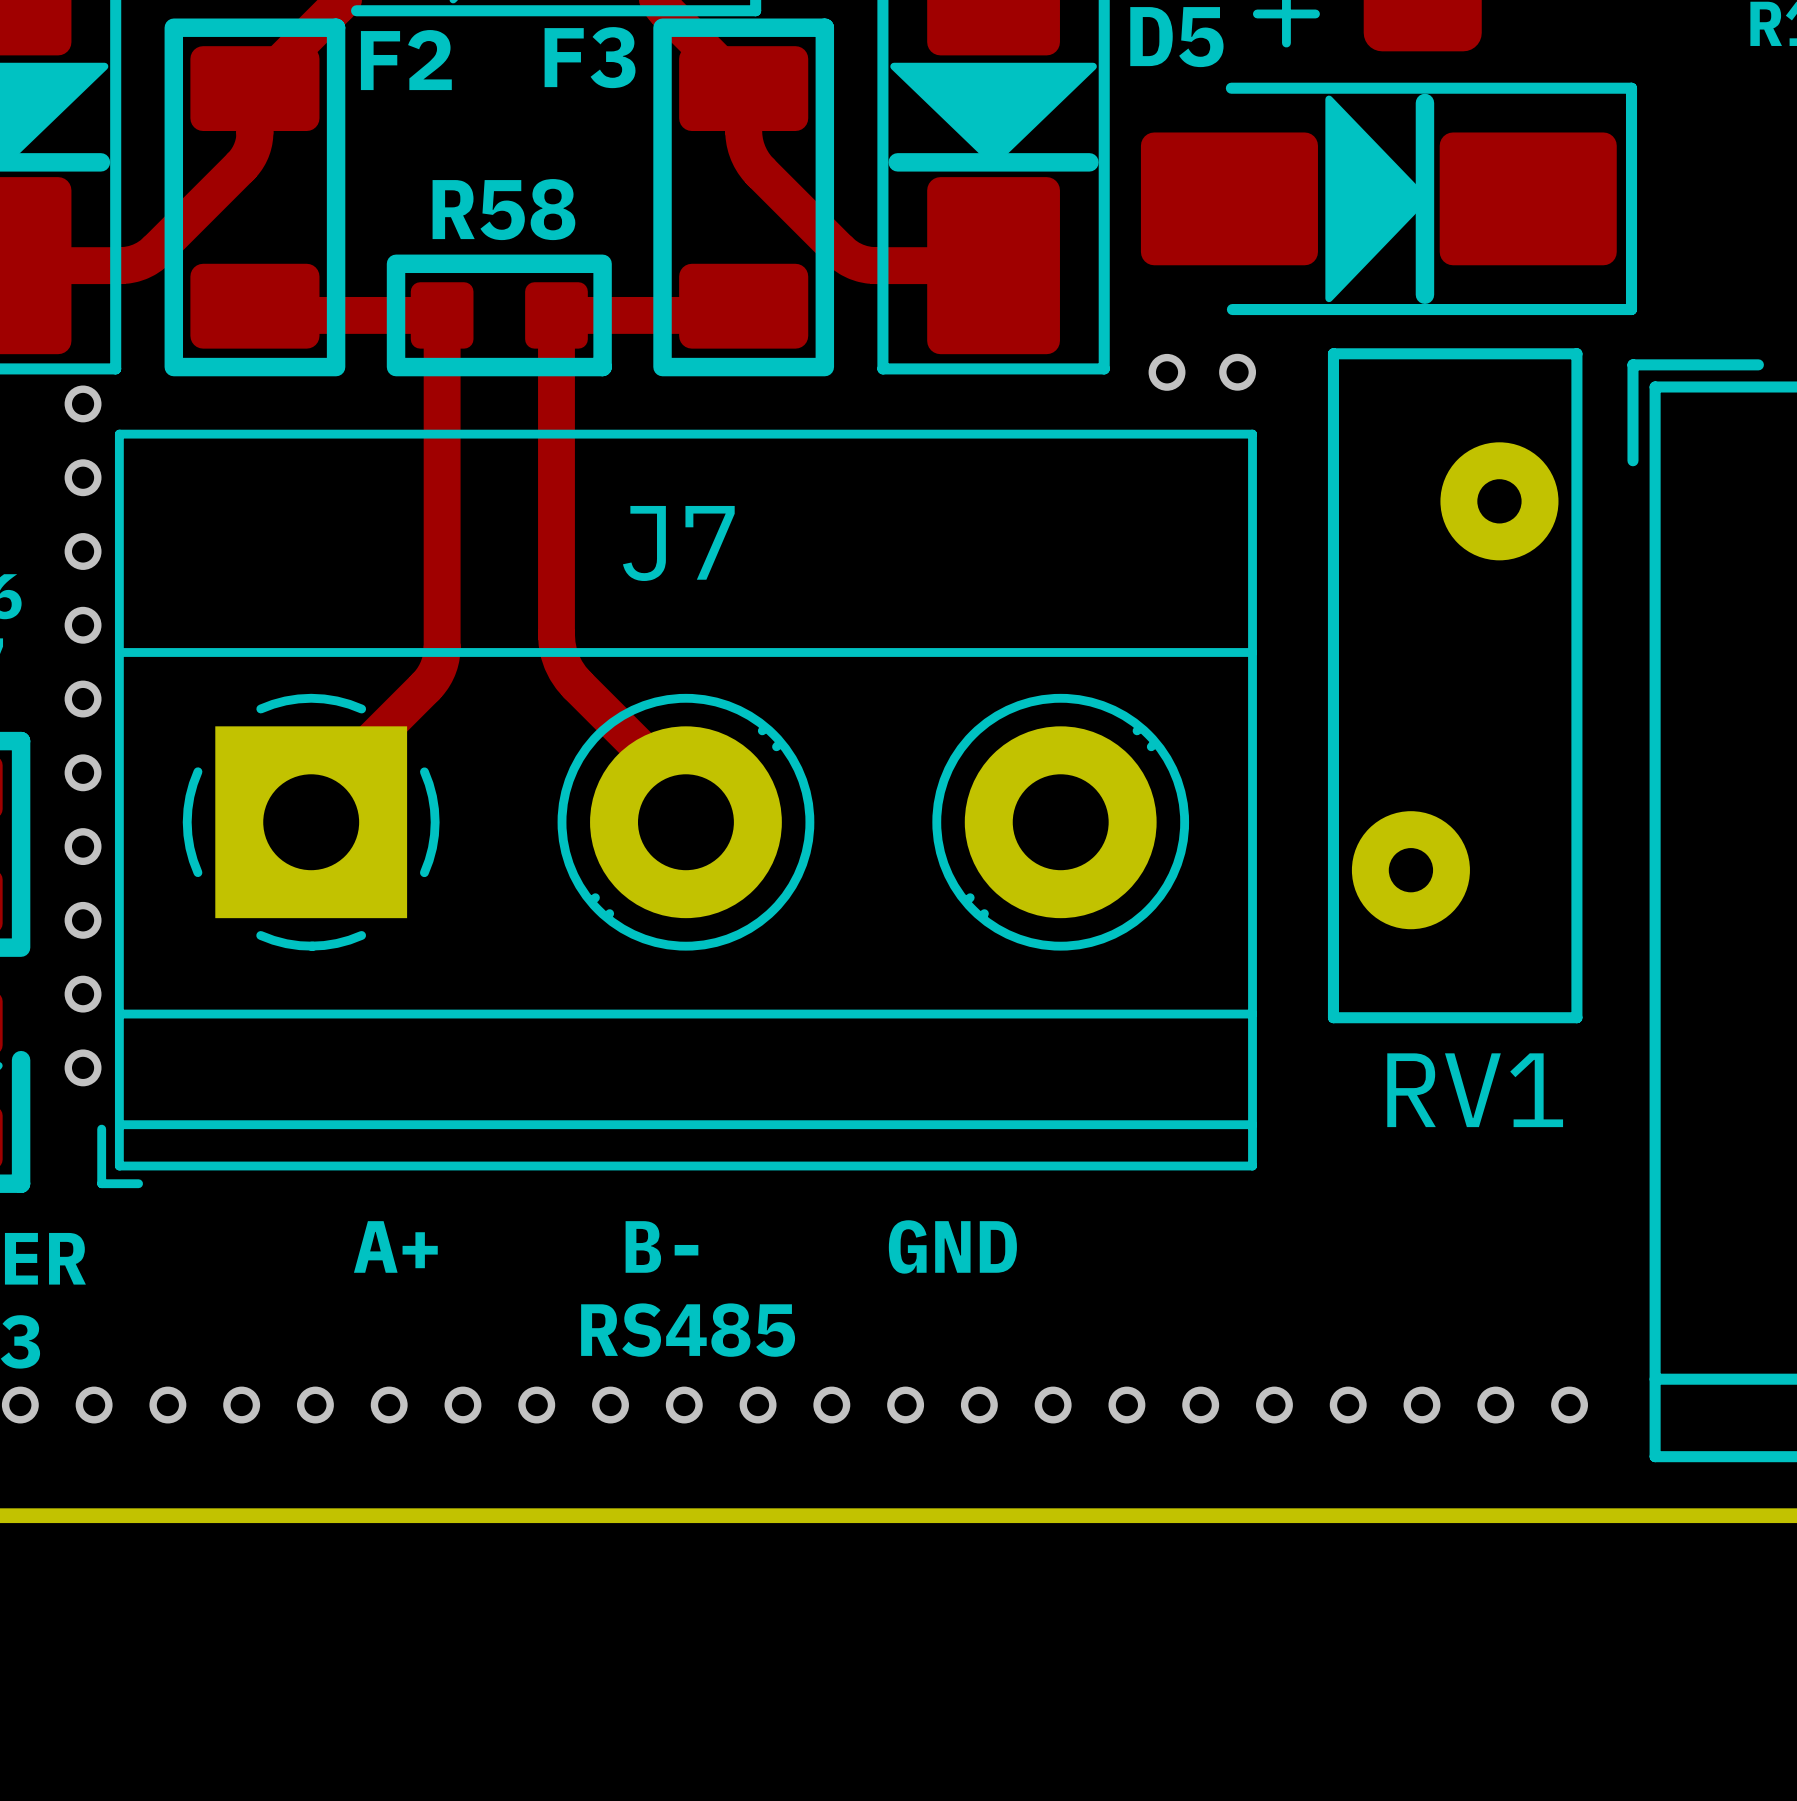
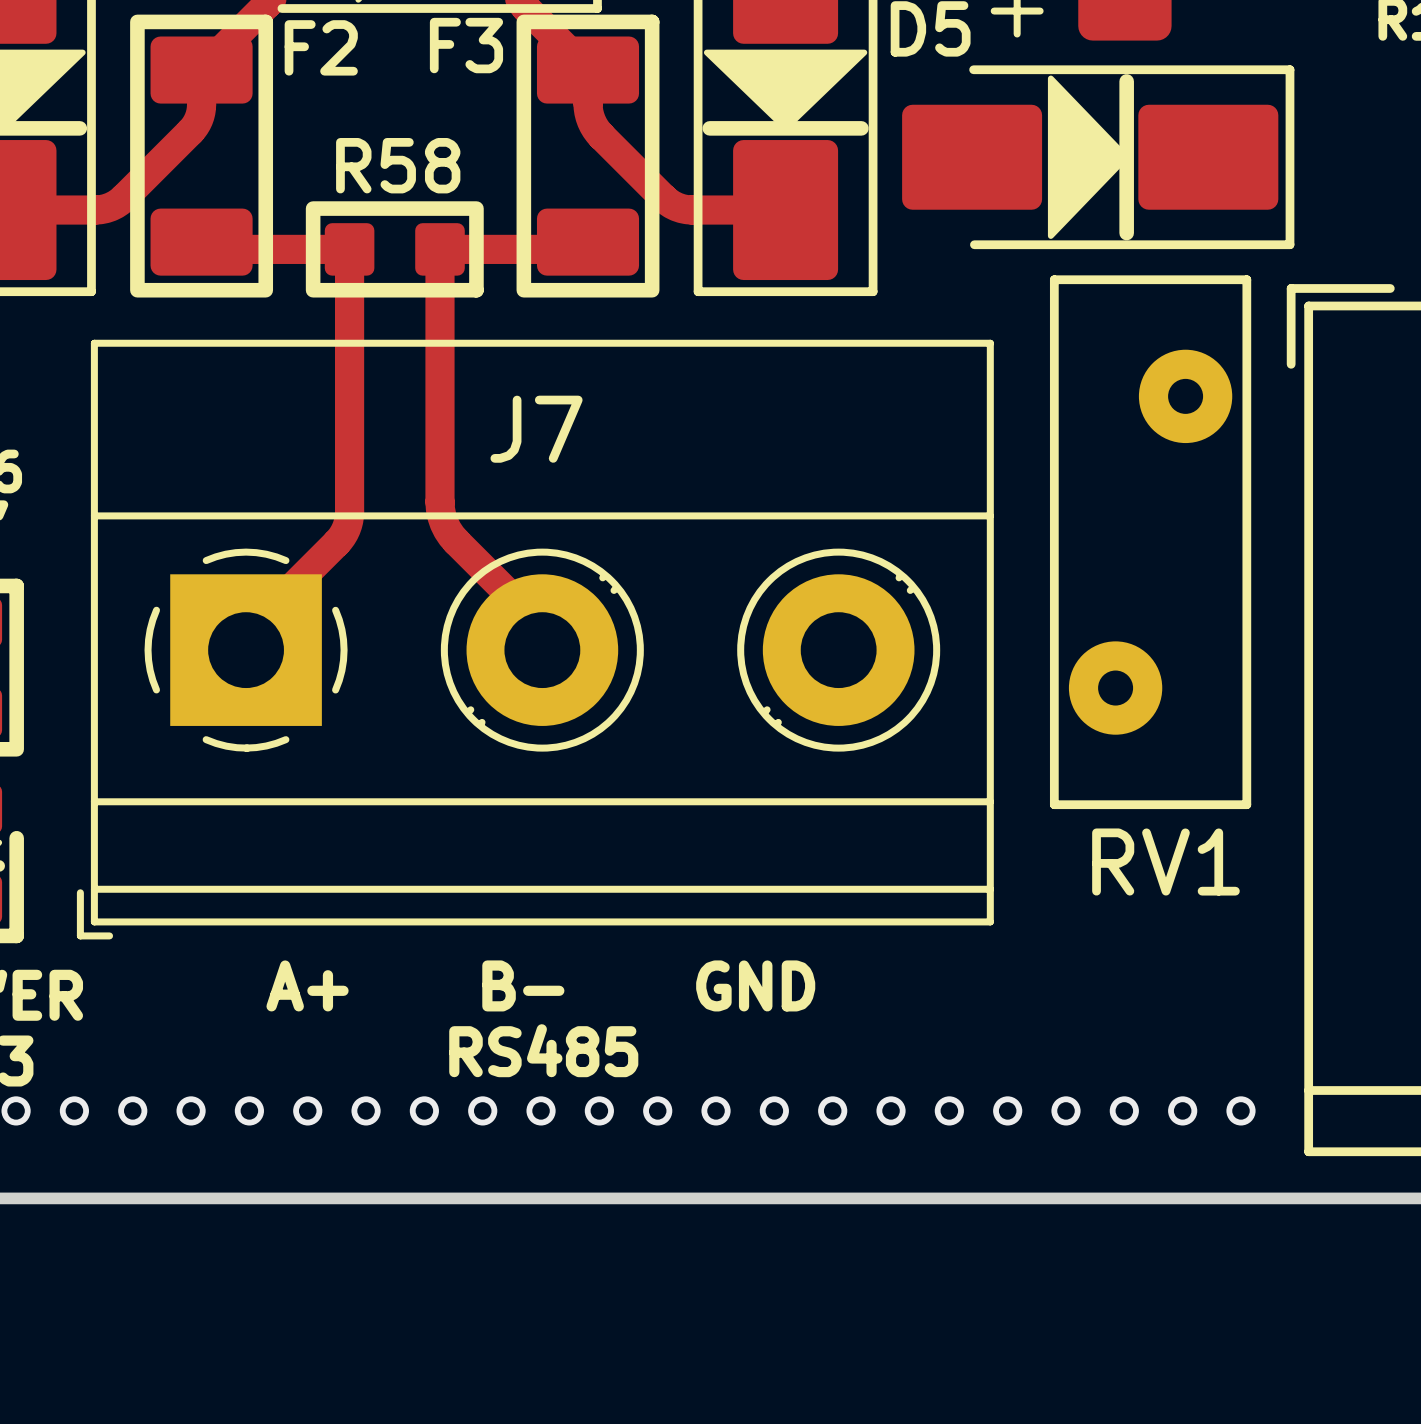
via: (1167, 372) -> none
via: (1237, 372) -> none
via: (83, 403) -> none
via: (83, 477) -> none
via: (83, 551) -> none
via: (83, 625) -> none
via: (83, 699) -> none
via: (83, 772) -> none
via: (83, 846) -> none
via: (83, 920) -> none
via: (83, 994) -> none
via: (83, 1067) -> none

